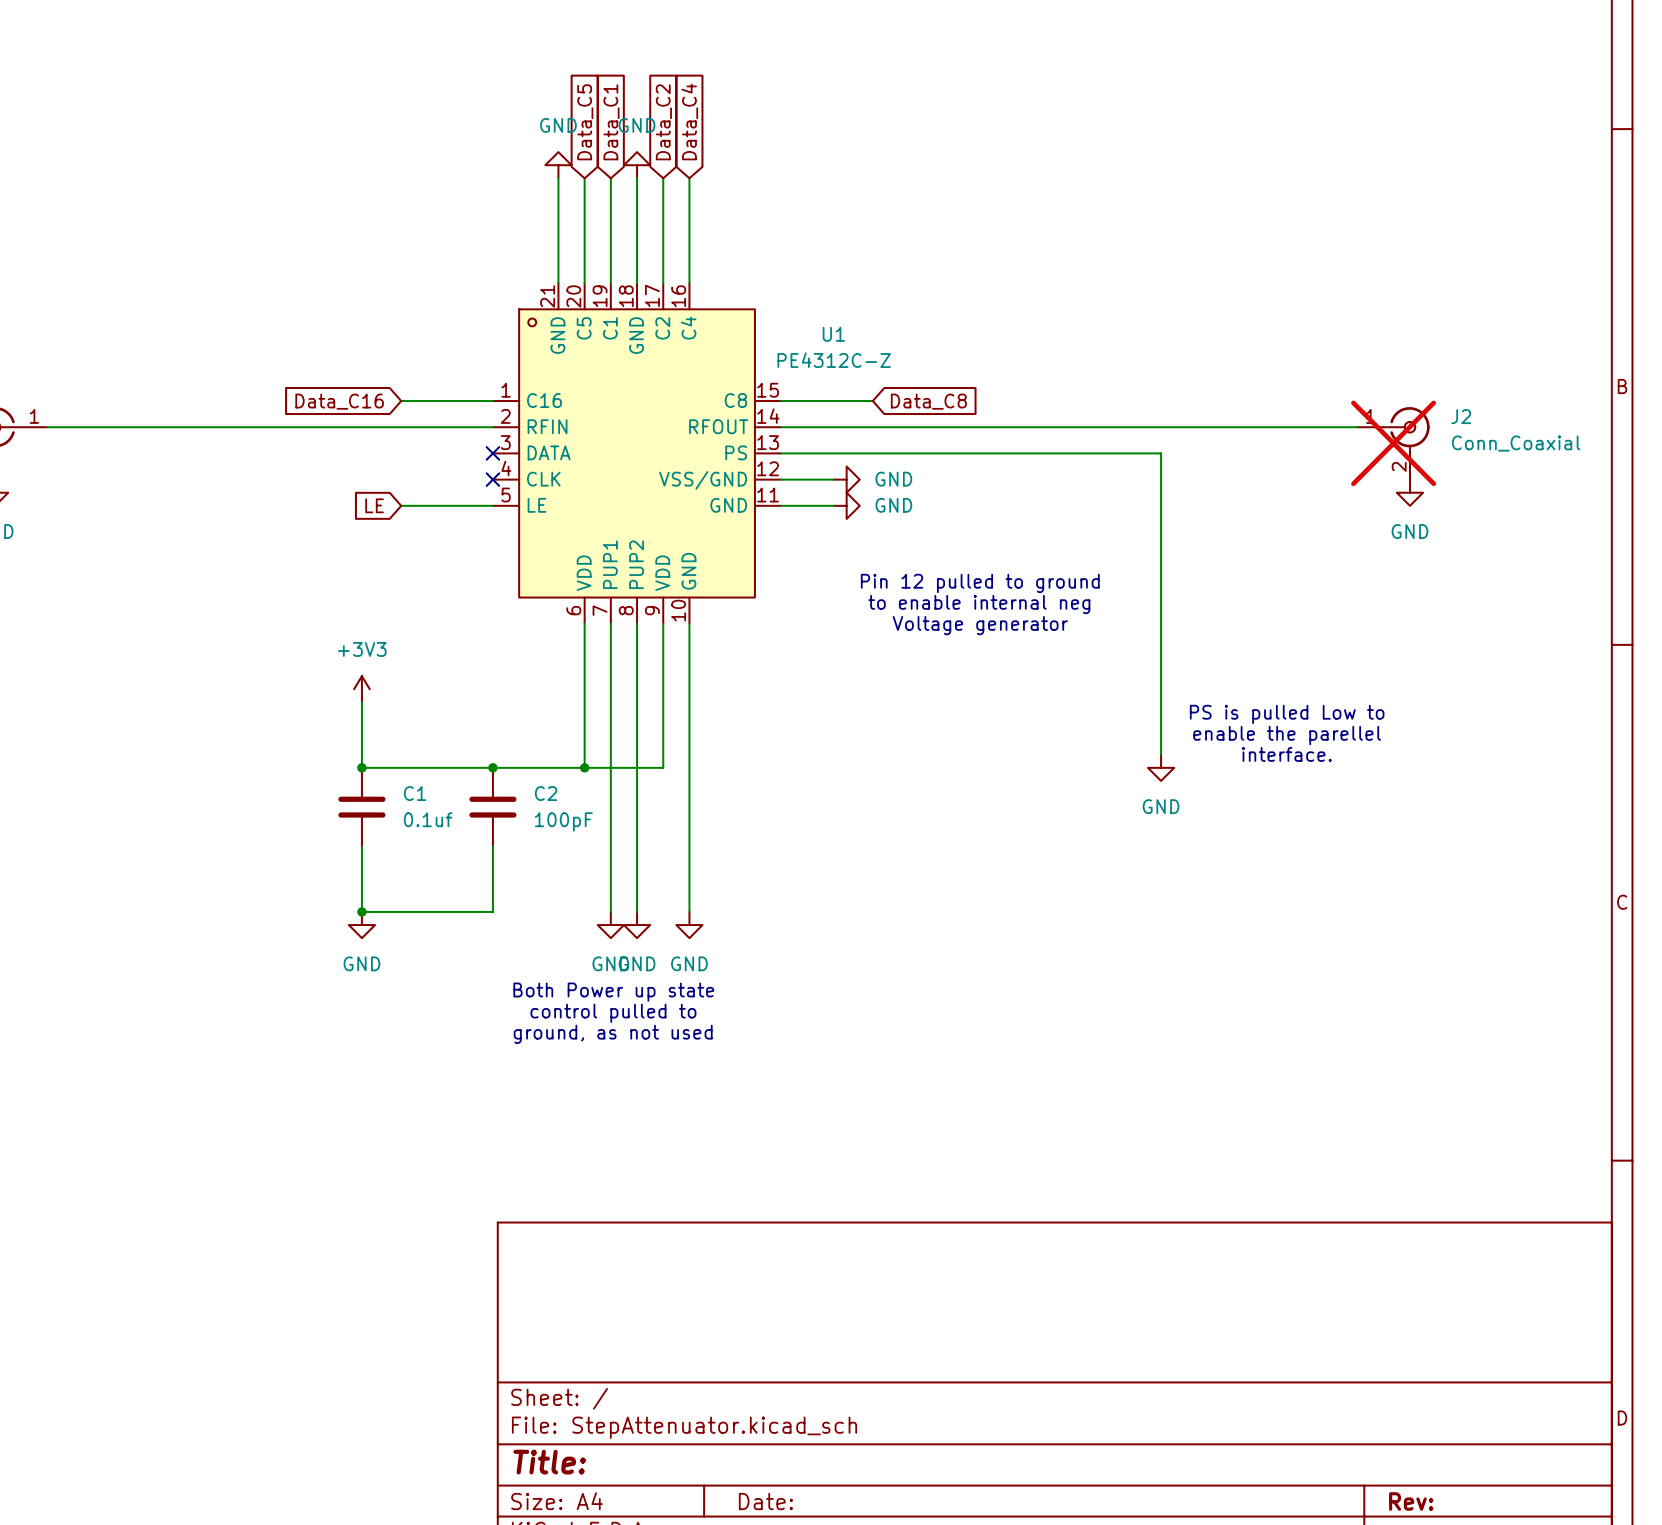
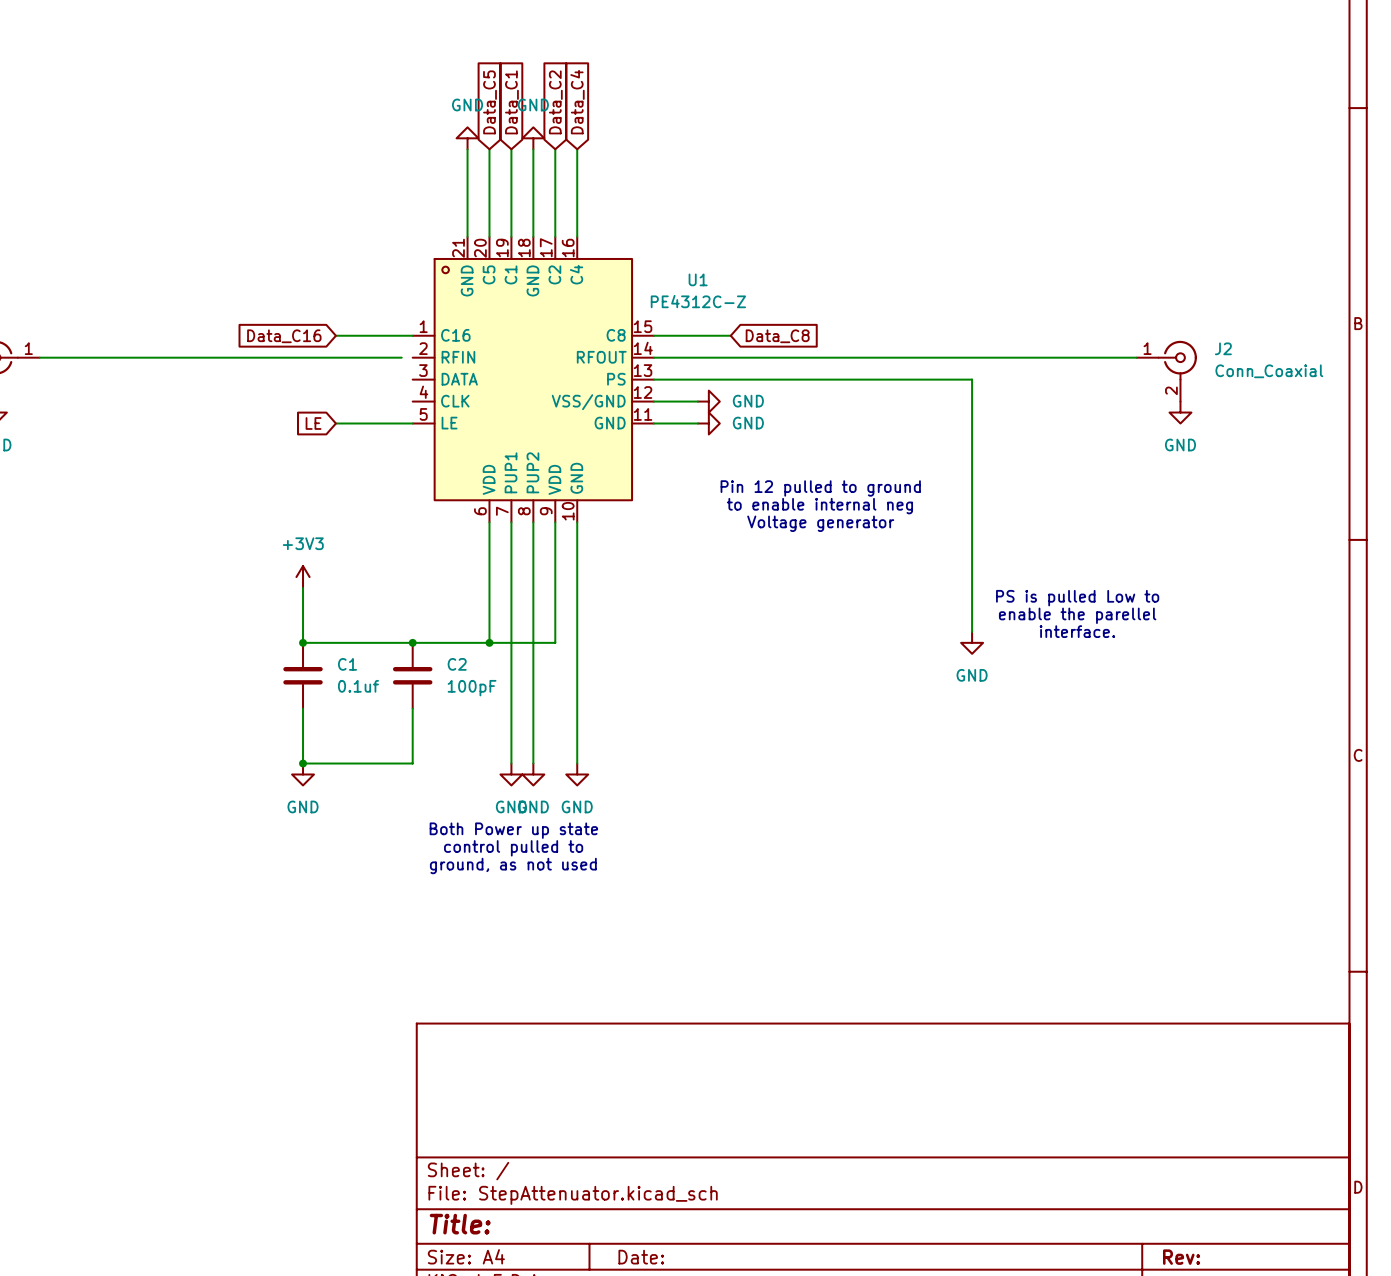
wire: (479, 427) (492, 427) -> none
J2 do-not-place cross: (1393, 443) -> none
no-connect mark: (492, 453) -> none
no-connect mark: (492, 479) -> none

